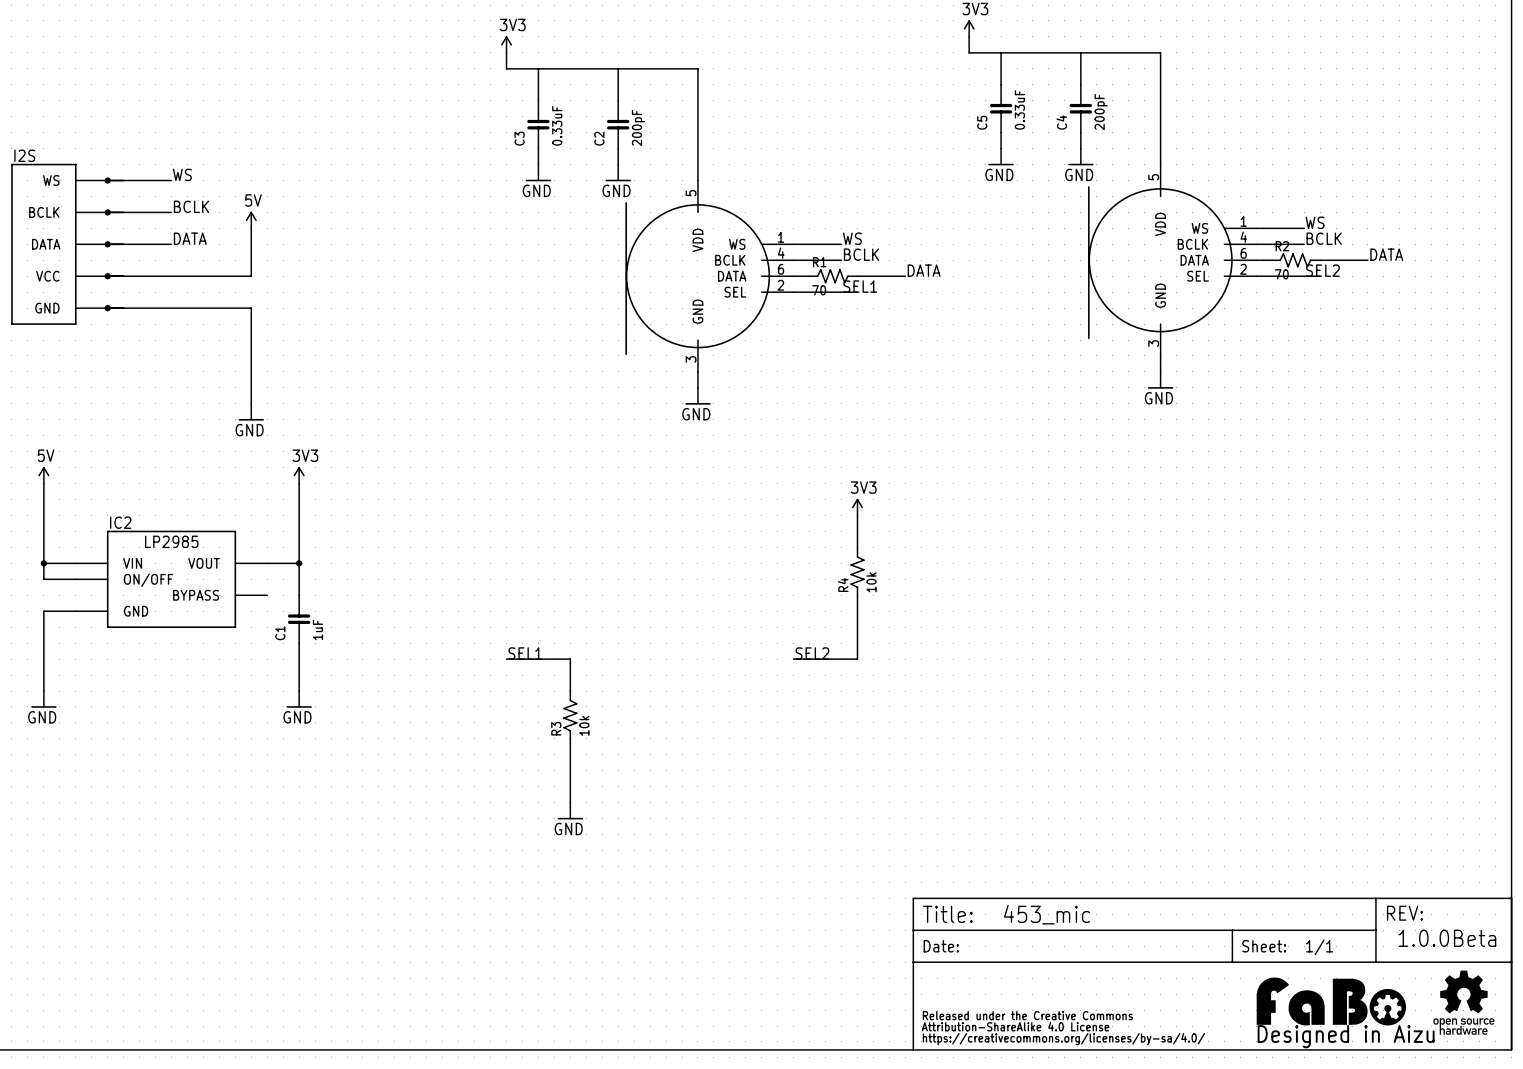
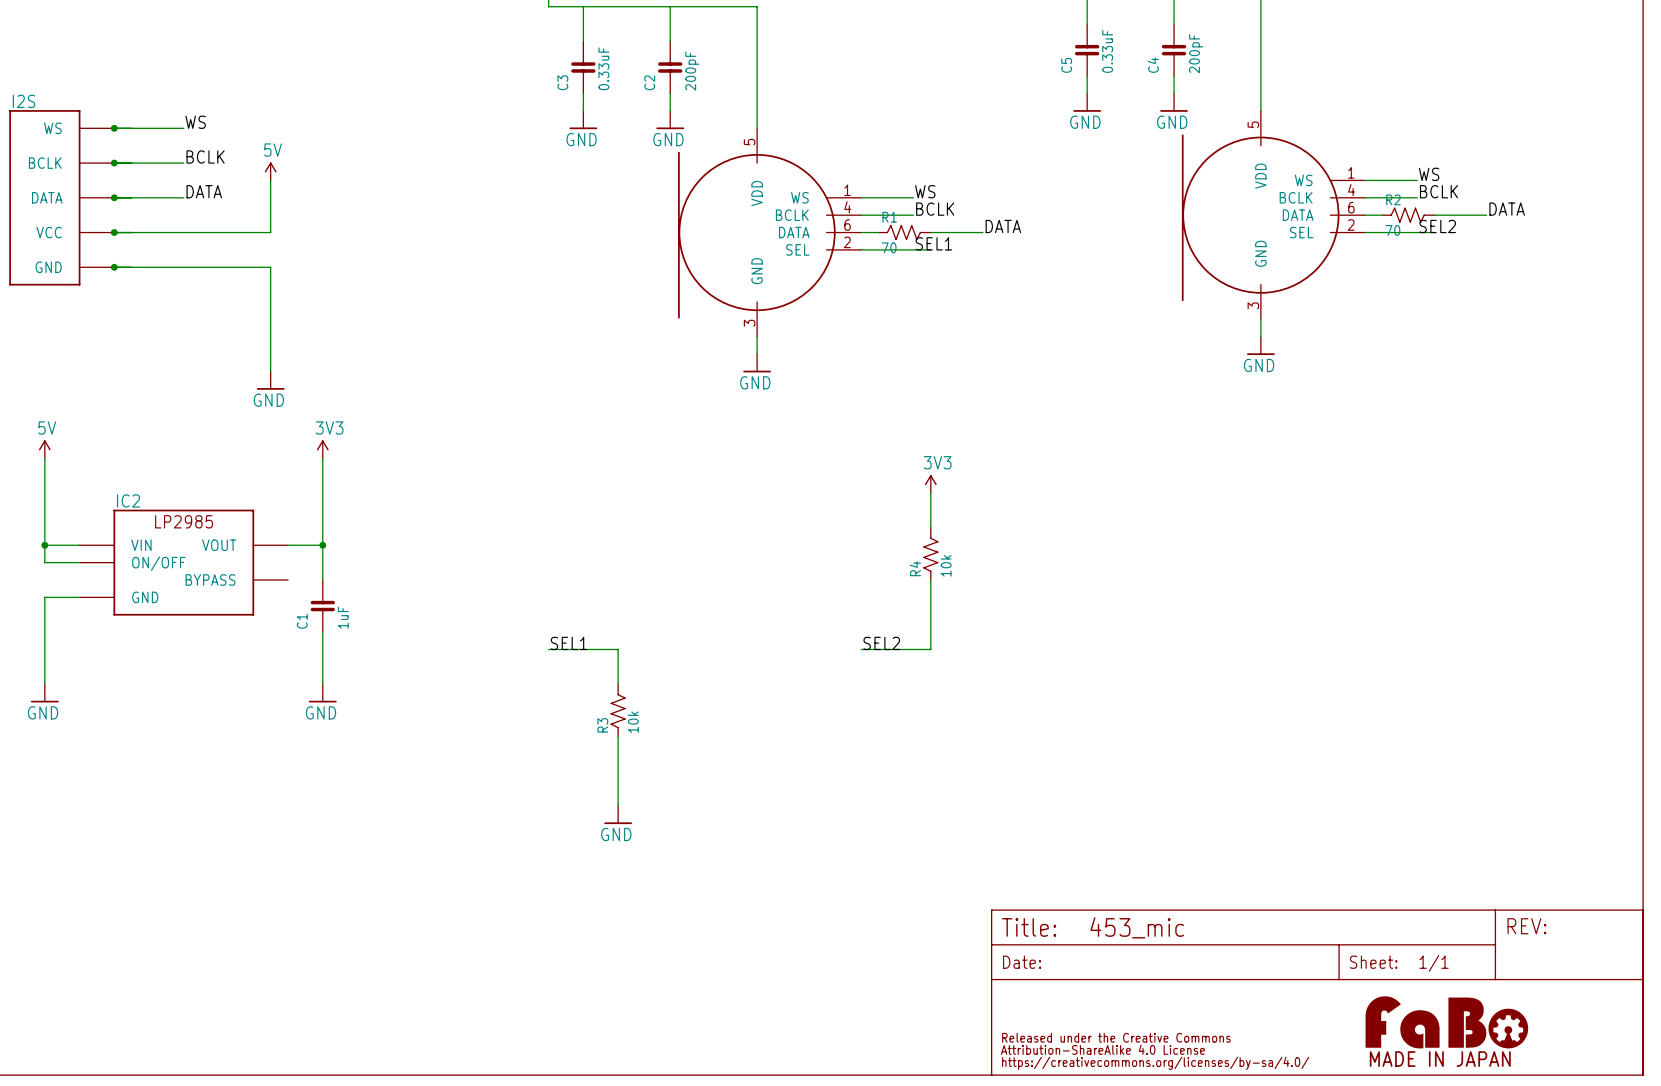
text: 1.0.0Beta (1447, 938) -> none
part: (1463, 1002) -> none
part text: none -> MADE IN JAPAN (1440, 1059)
part text: Designed in Aizu (1346, 1036) -> none

